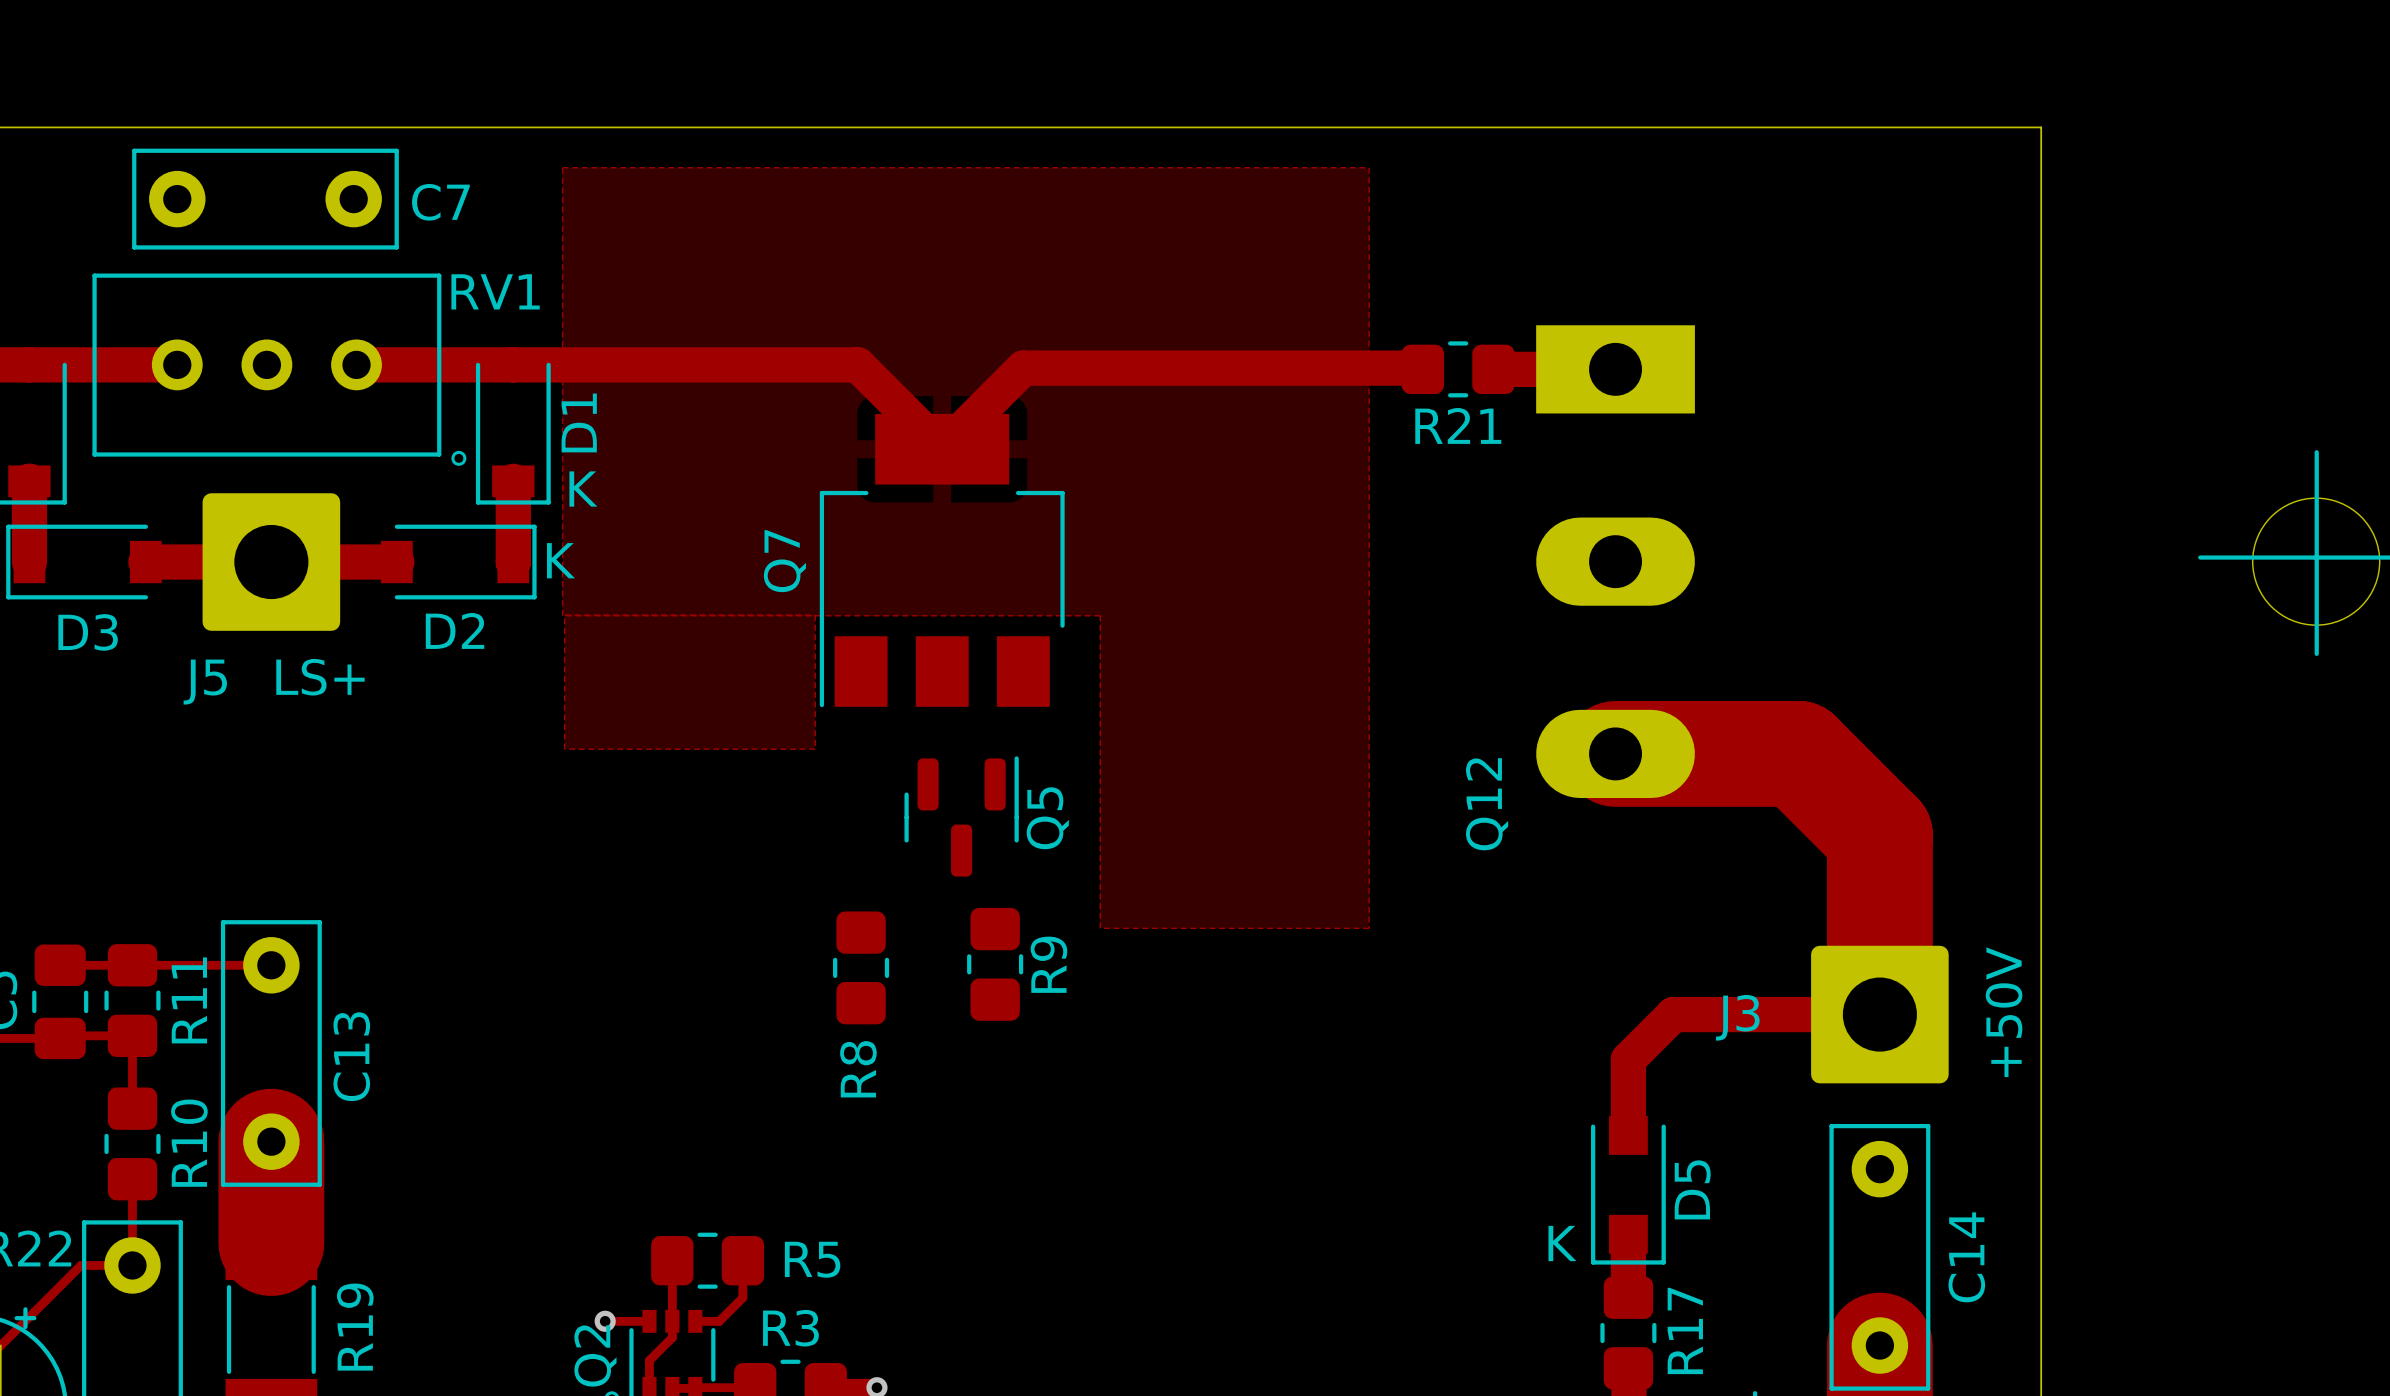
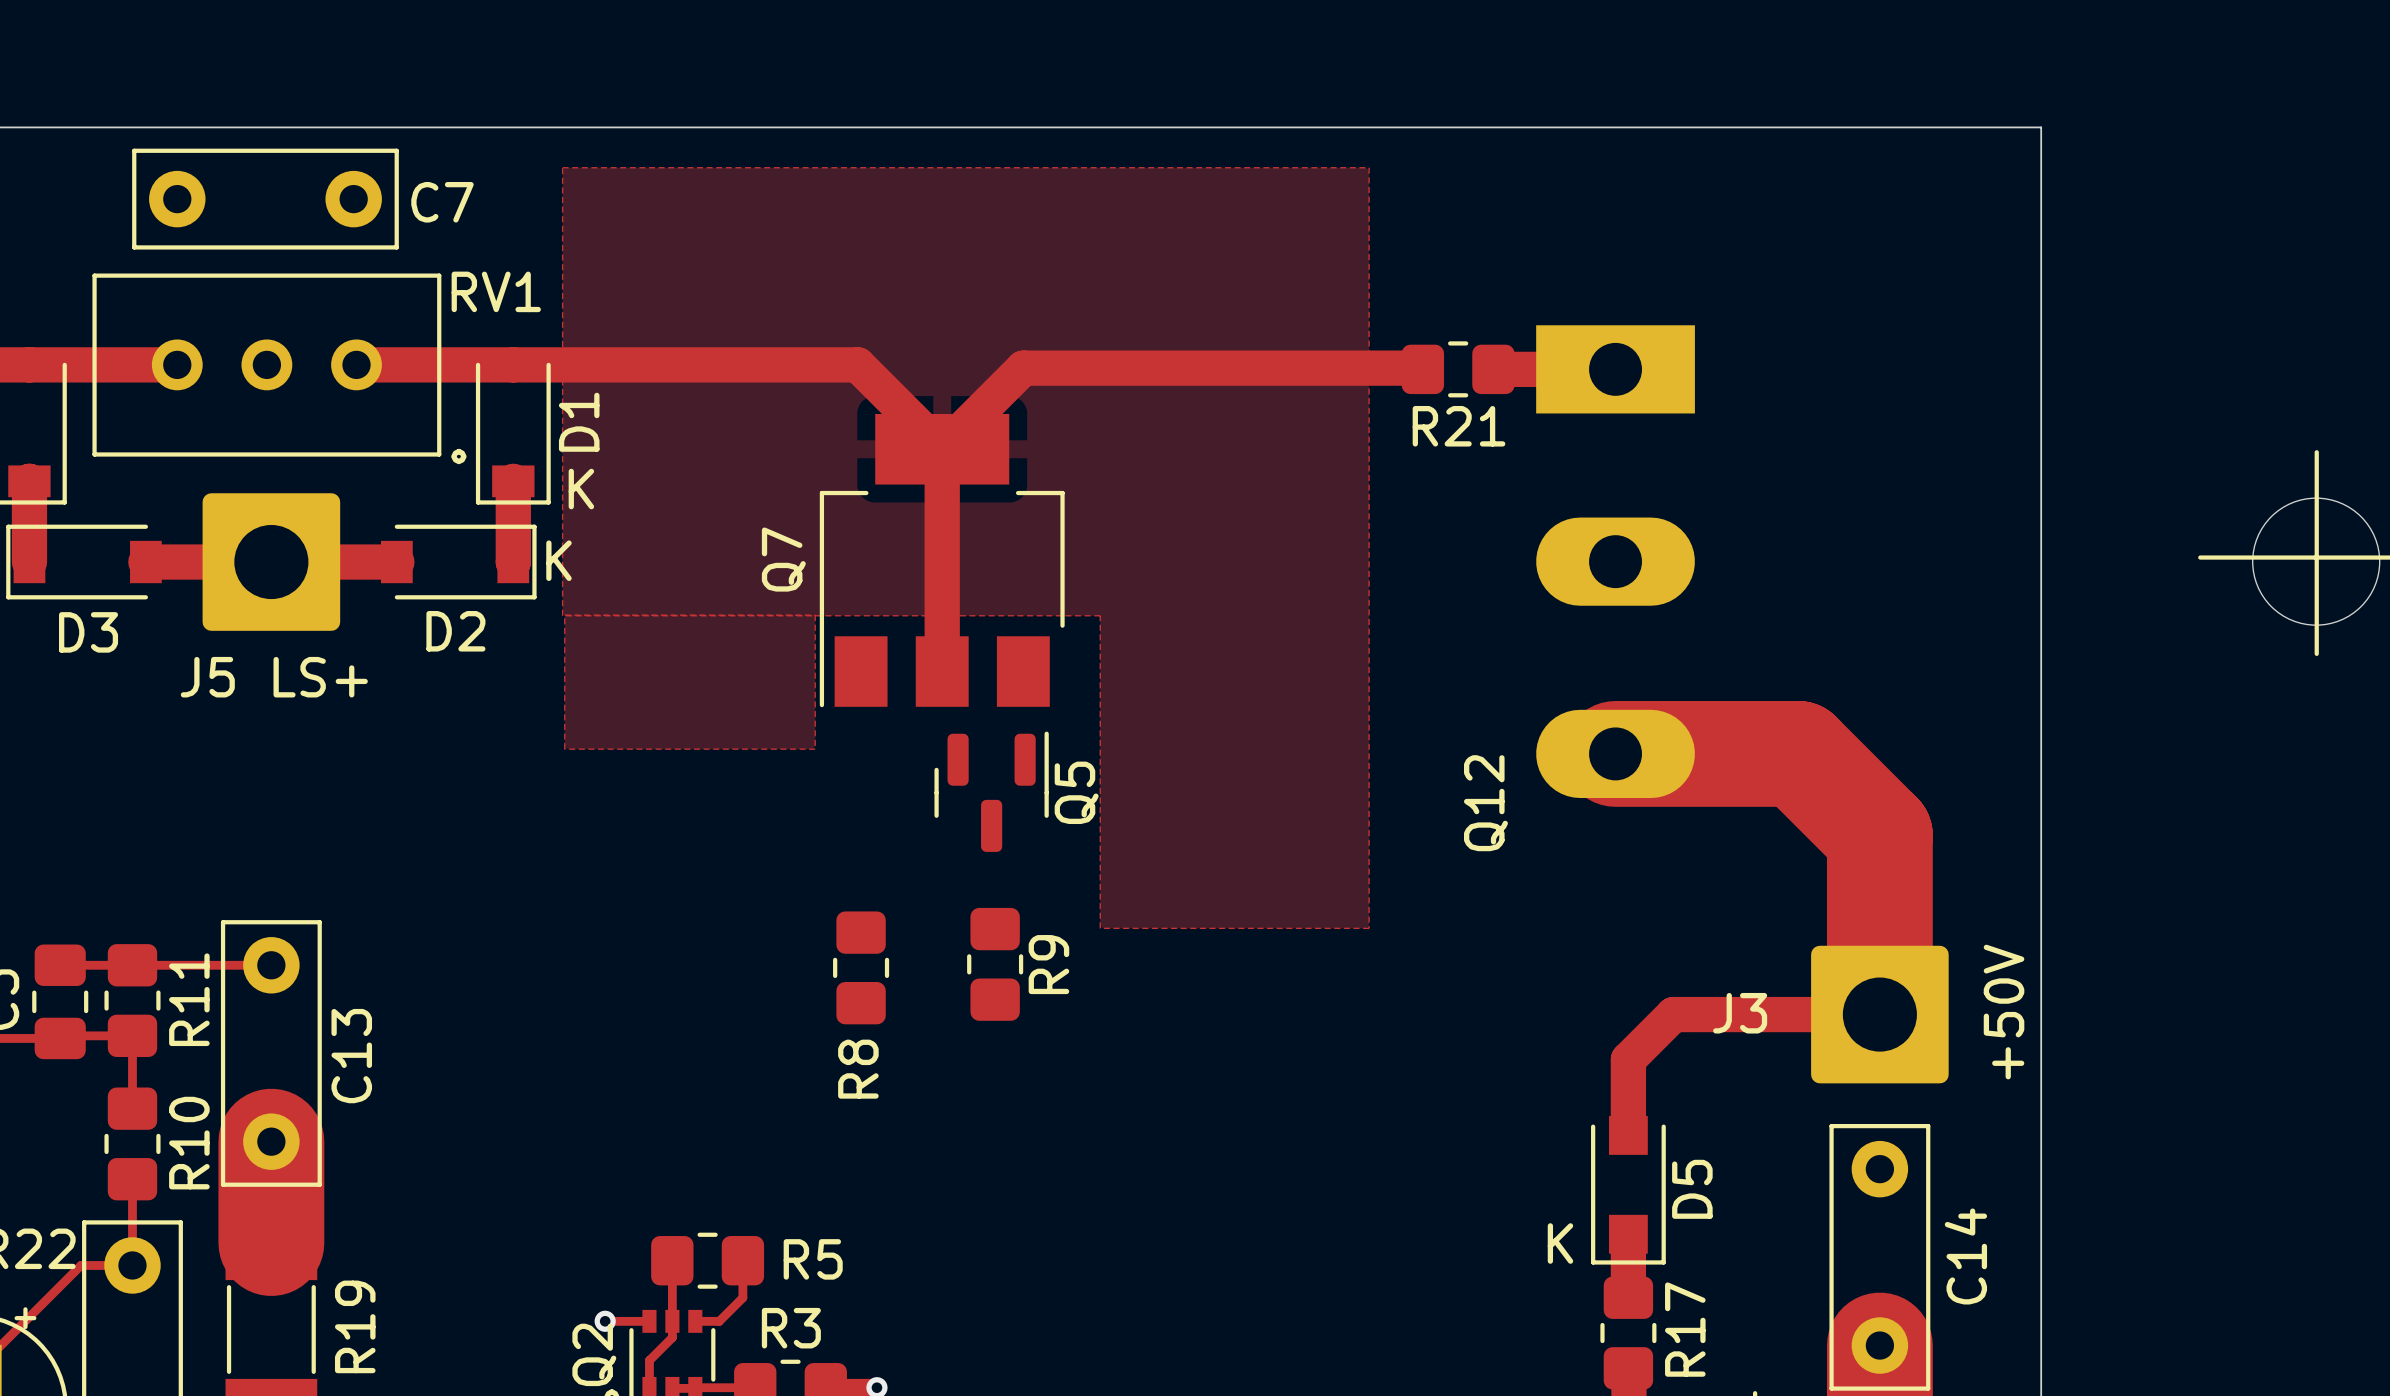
track: none -> (942, 449) (942, 671)
Q5 position: (961, 816) -> (991, 791)

